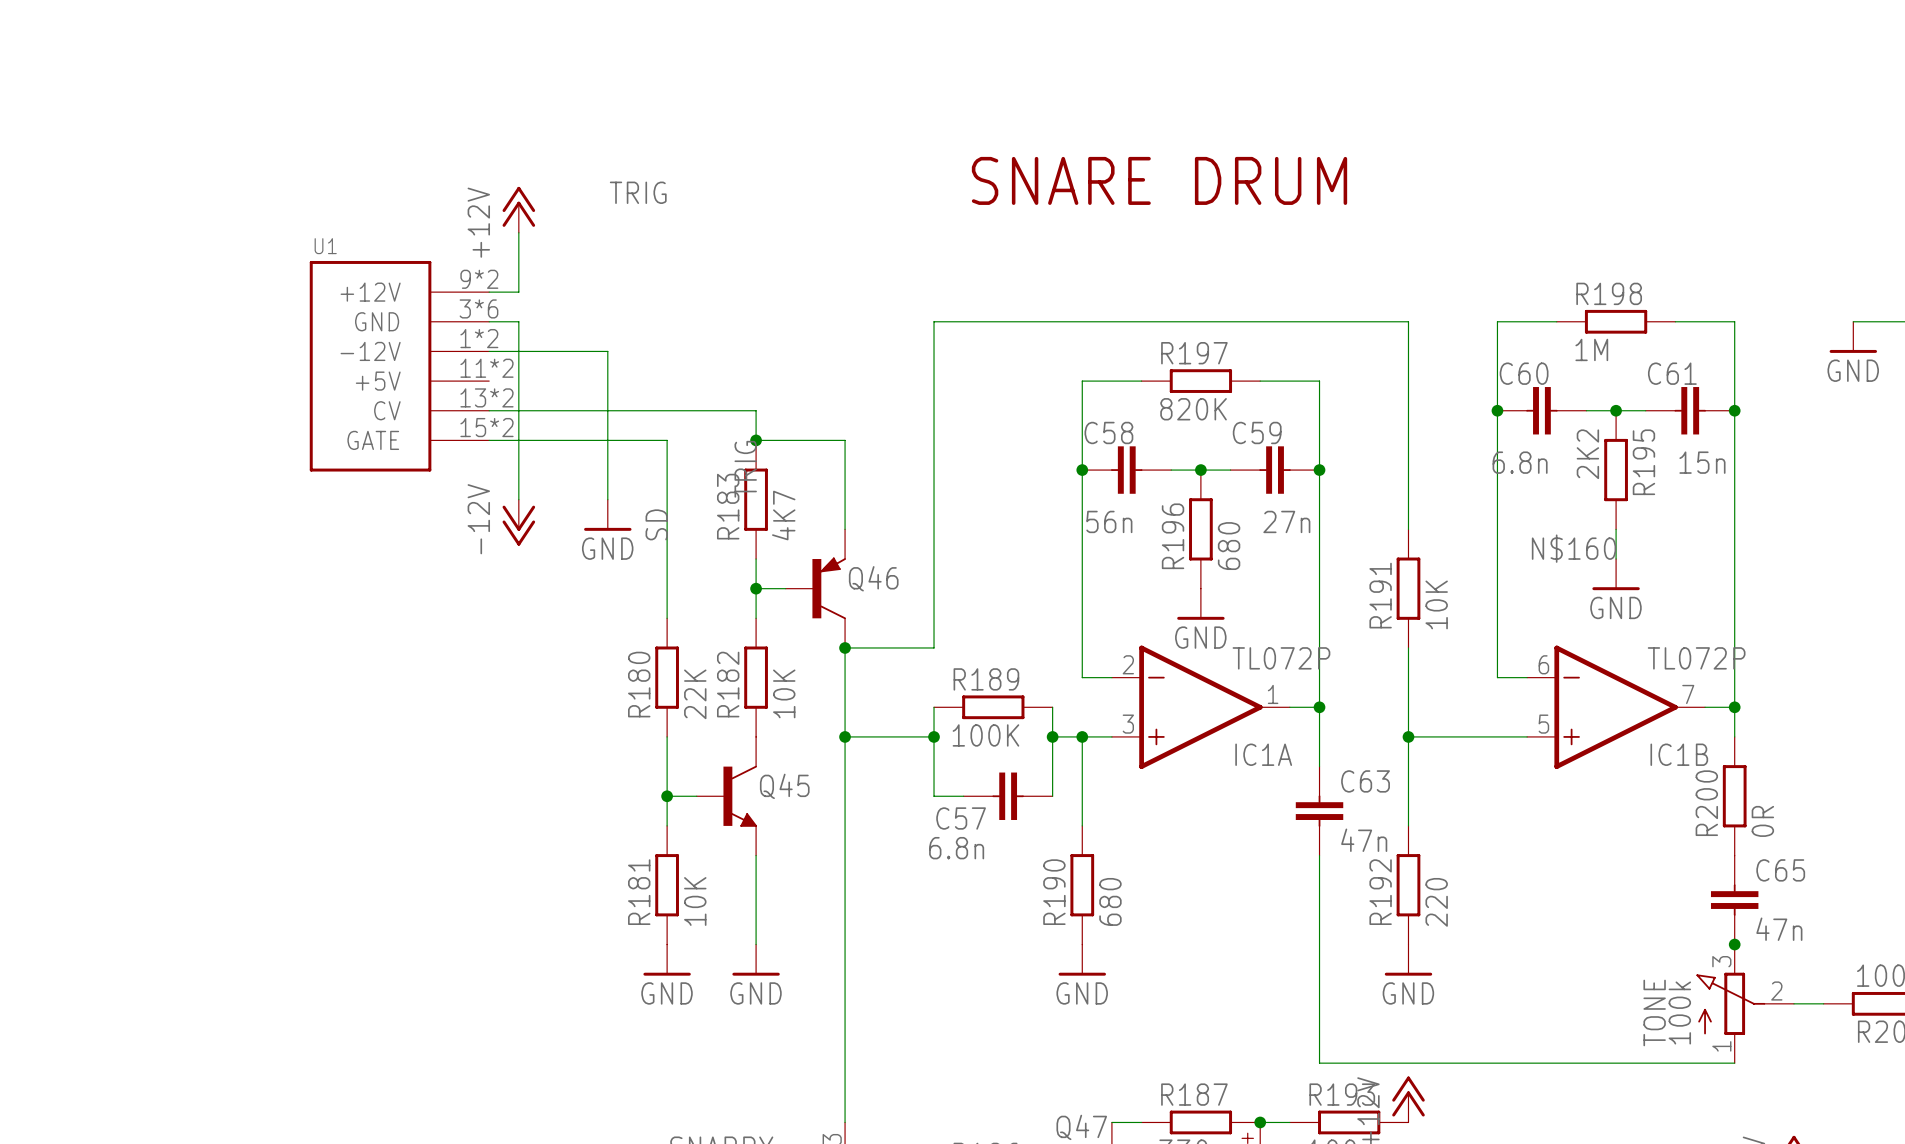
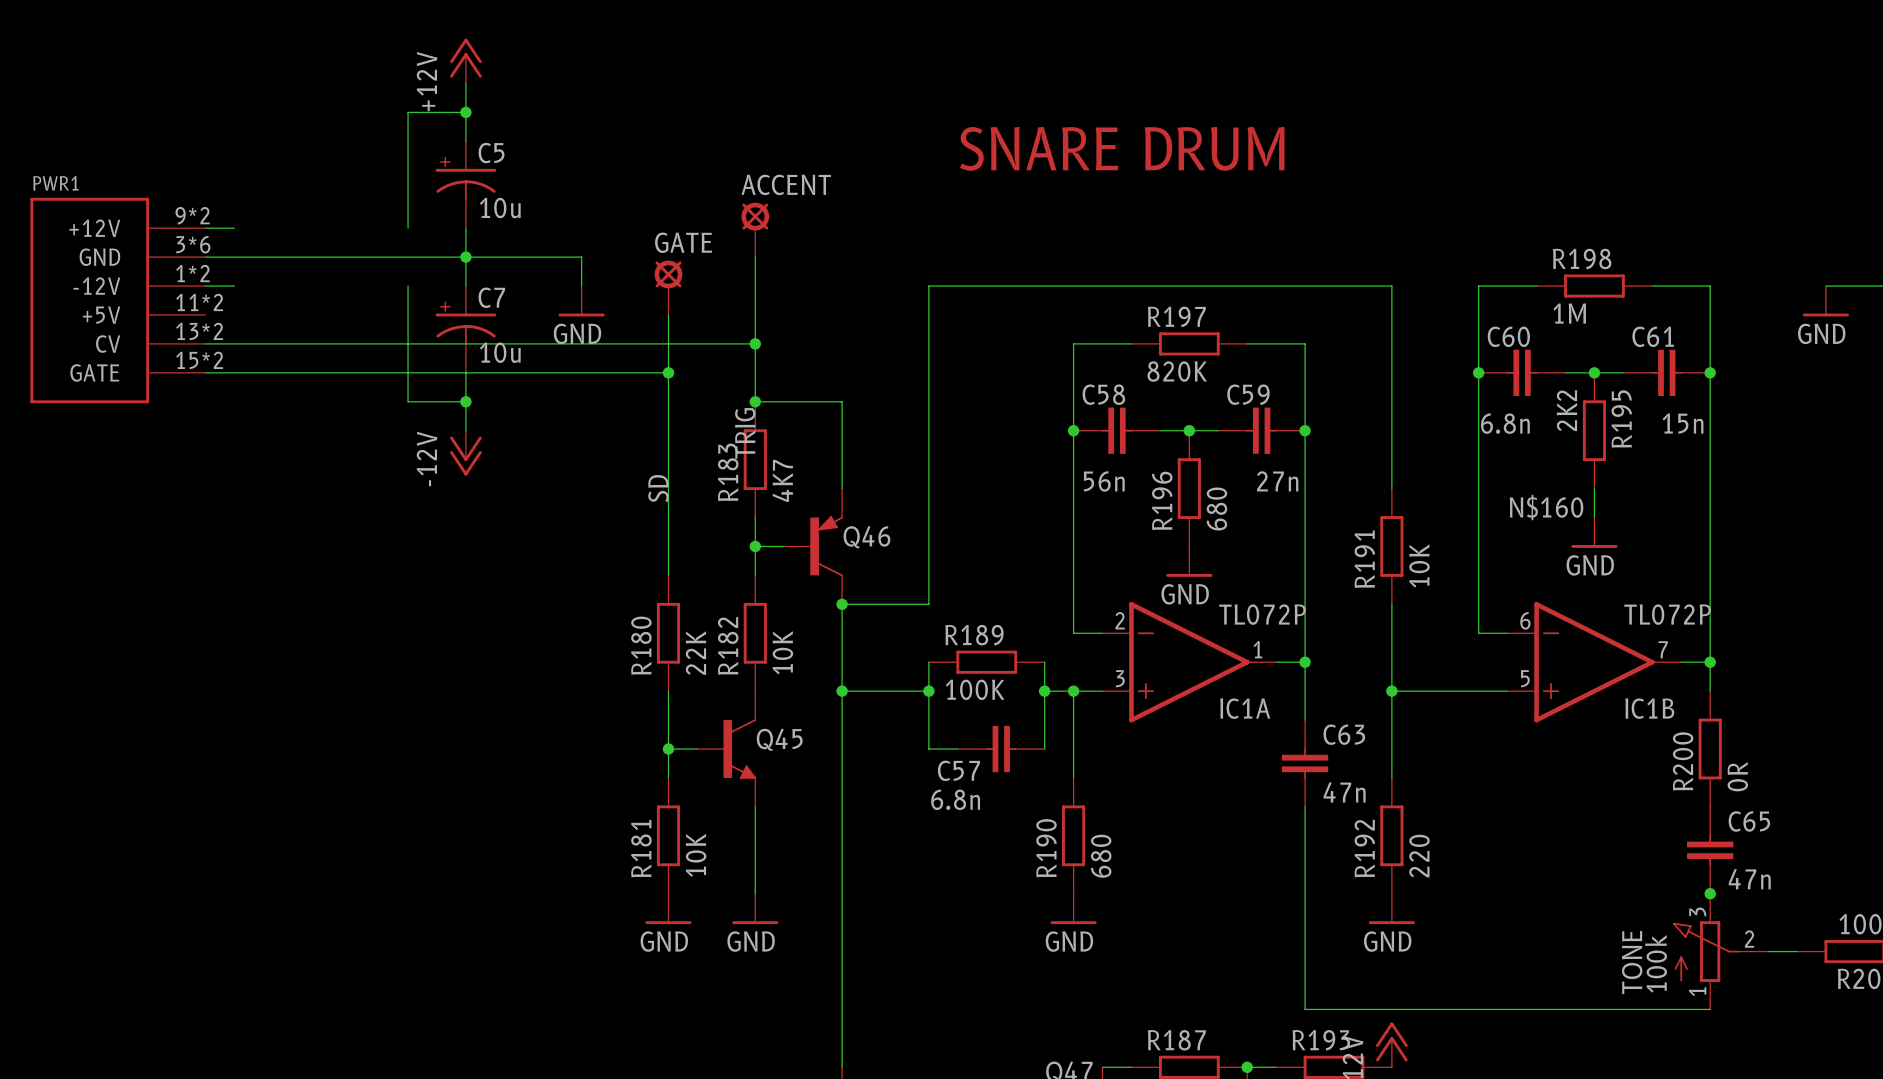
wire: none -> (465, 83) (465, 141)
wire: none -> (465, 112) (408, 112) (408, 228)
junction: none -> (465, 112)
label: TRIG (638, 192) -> none
power symbol position: +12V (518, 209) -> +12V (465, 61)
C5: none -> 10u (465, 184)
wire: (518, 232) (518, 292) -> (581, 286) (581, 257) (523, 257)
wire: none -> (205, 228) (234, 228)
wire: none -> (465, 228) (465, 286)
ACCENT: none -> (755, 229)
wire: none -> (205, 257) (494, 257)
junction: none -> (465, 257)
wire: none -> (205, 286) (234, 286)
wire: none -> (408, 286) (408, 401) (465, 401)
wire: (489, 321) (518, 321) (518, 499) -> none
GATE: none -> (668, 287)
PWR1: none -> (117, 300)
wire: (489, 351) (607, 351) (607, 499) -> none
U1: (399, 366) -> none
C7: none -> 10u (465, 329)
wire: none -> (205, 343) (755, 343)
junction: none -> (755, 343)
wire: none -> (205, 372) (494, 372)
wire: none -> (465, 372) (465, 430)
wire: (667, 410) (756, 410) -> (755, 257) (755, 372)
junction: none -> (668, 372)
junction: none -> (465, 401)
wire: (489, 440) (667, 440) -> (668, 314) (668, 401)
power symbol position: GND (607, 515) -> GND (581, 301)
power symbol position: -12V (518, 522) -> -12V (465, 453)

